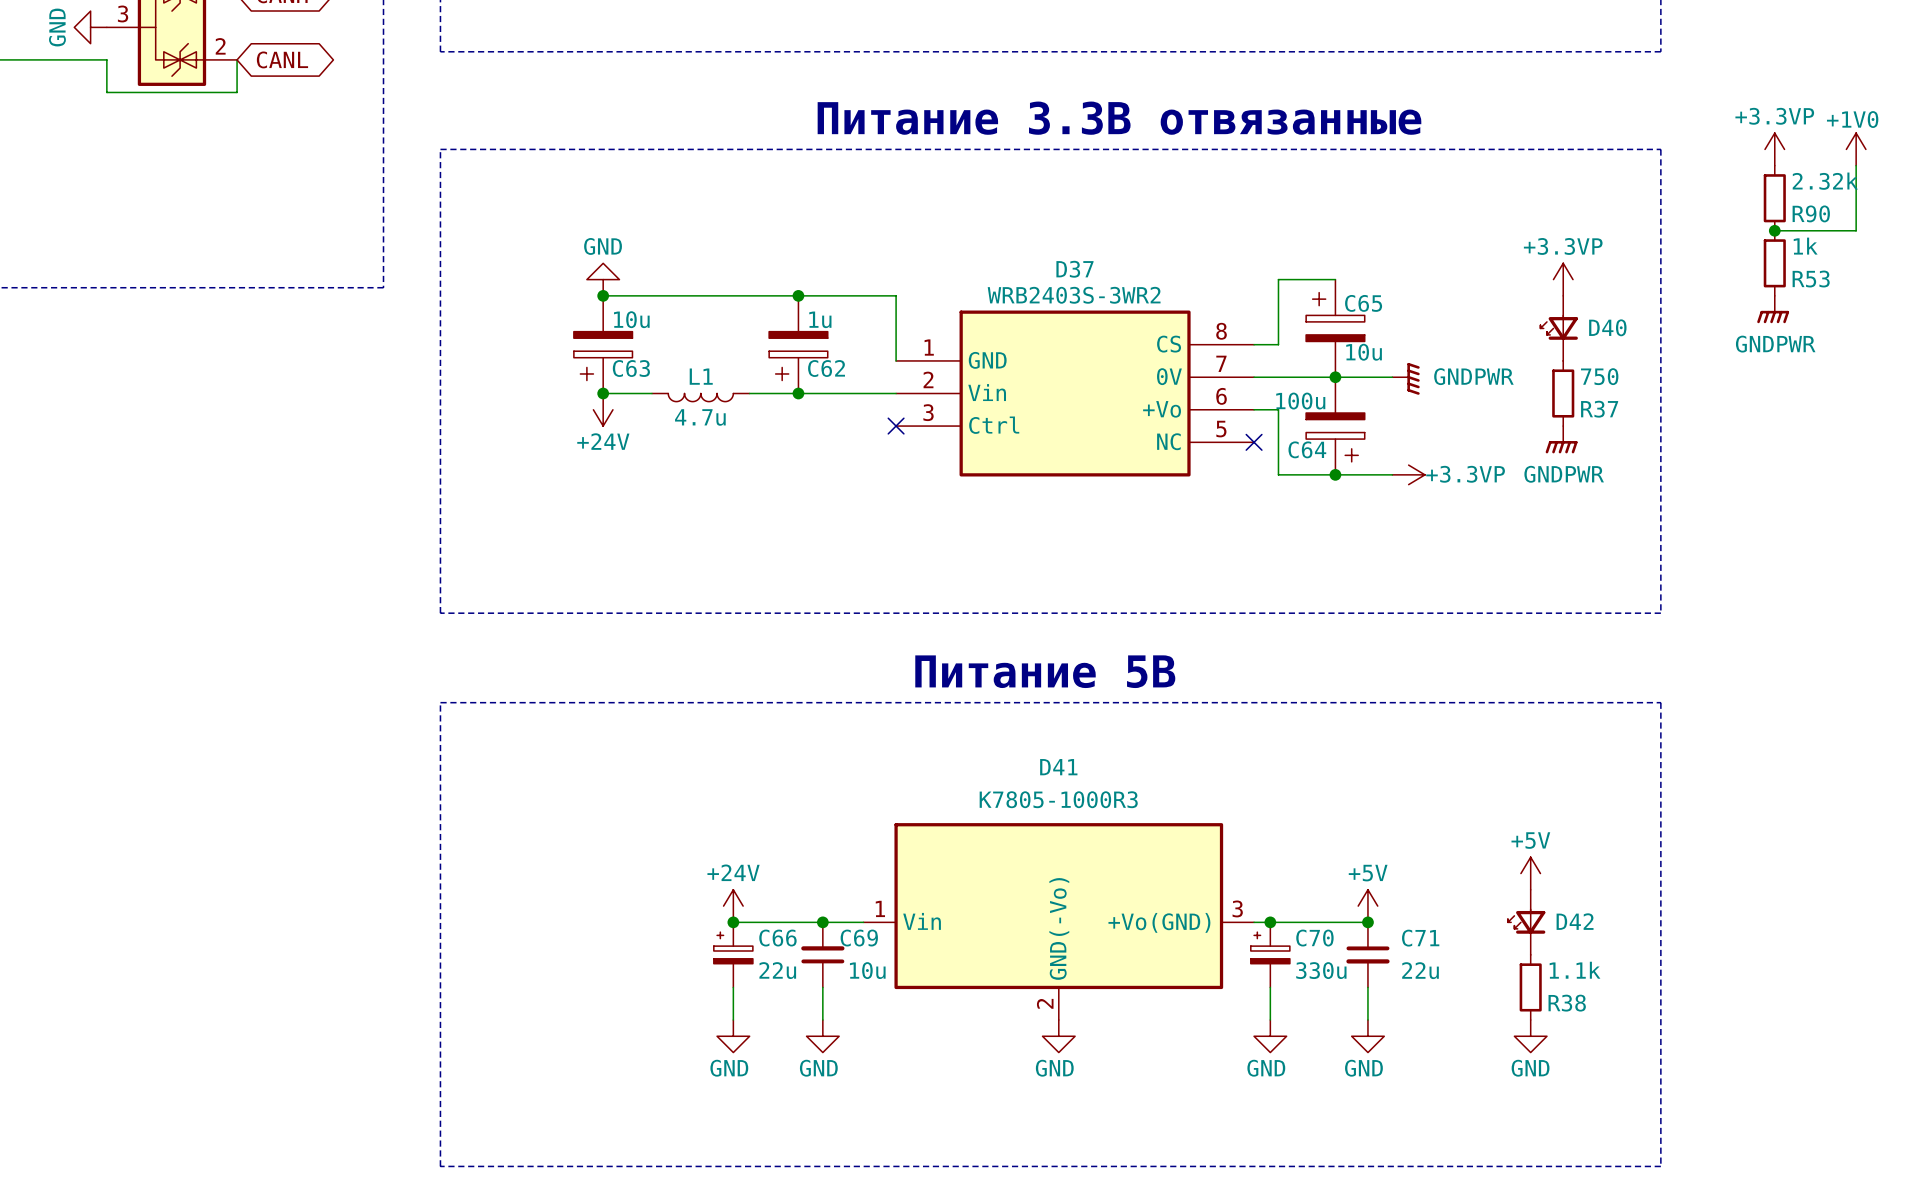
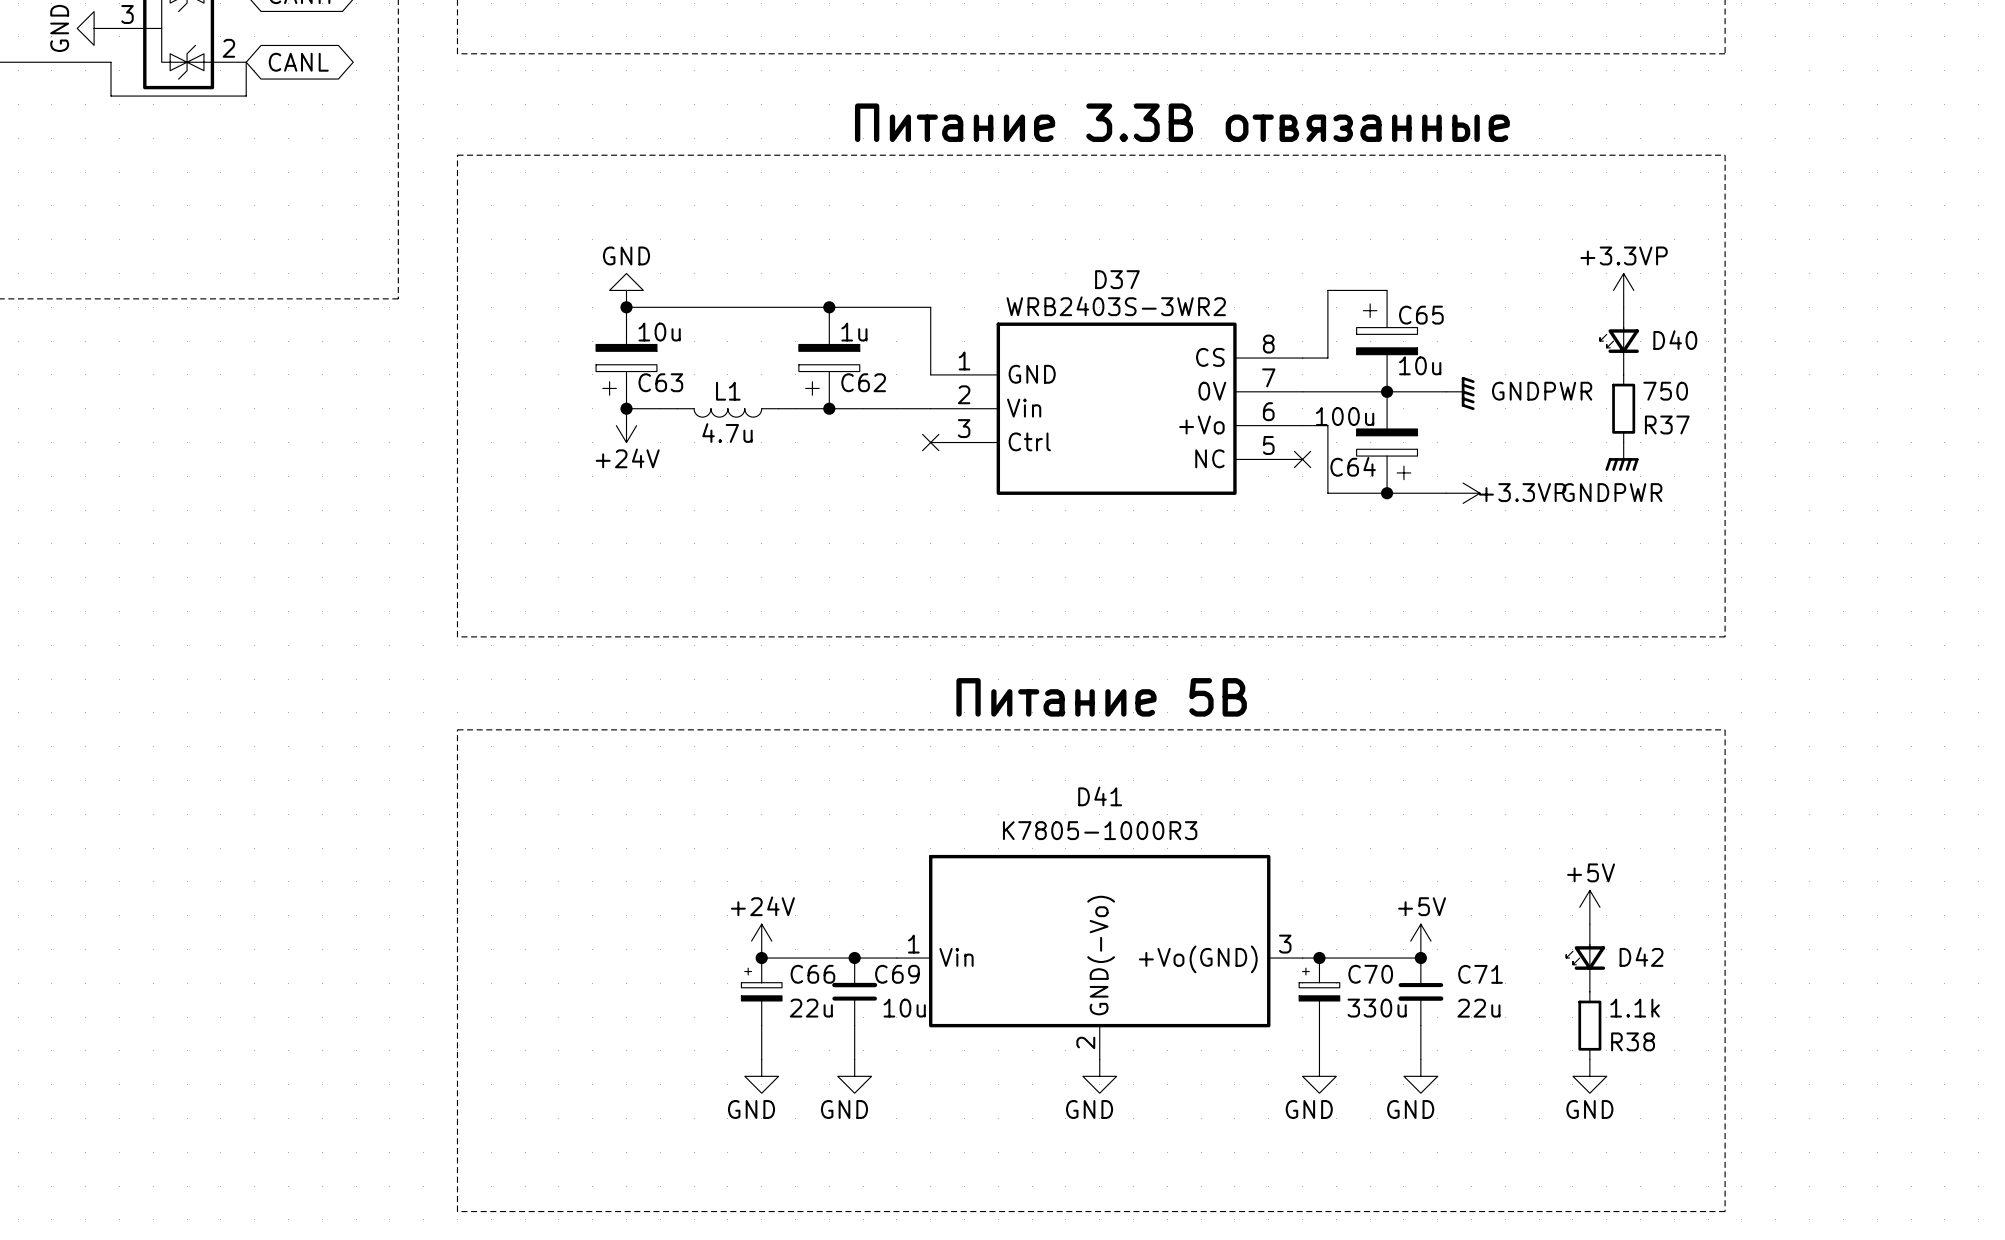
power symbol: +3.3VP (1774, 149) -> none
power symbol: +1V0 (1856, 149) -> none
wire: (1856, 165) (1856, 230) (1774, 230) -> none
R90: 2.32k (1774, 198) -> none
junction: (1774, 230) -> none
R53: 1k (1774, 263) -> none
power symbol: GNDPWR (1773, 309) -> none

